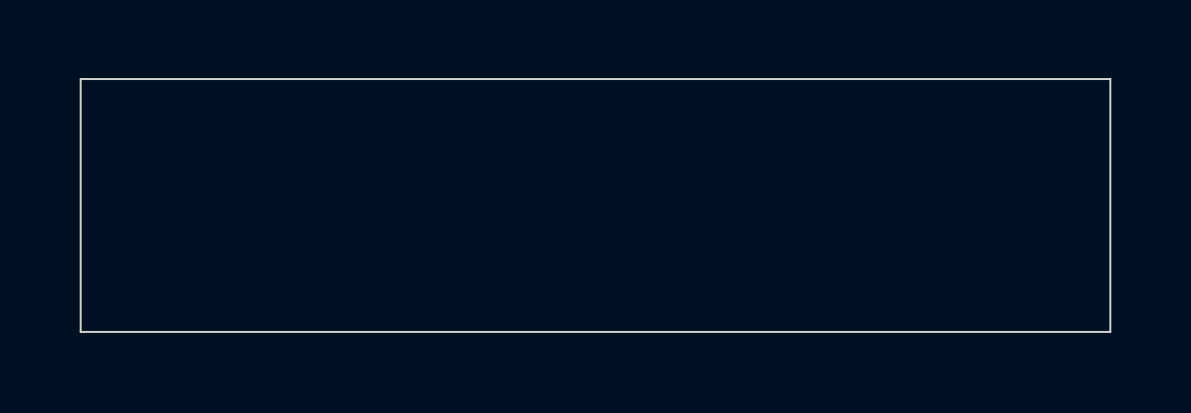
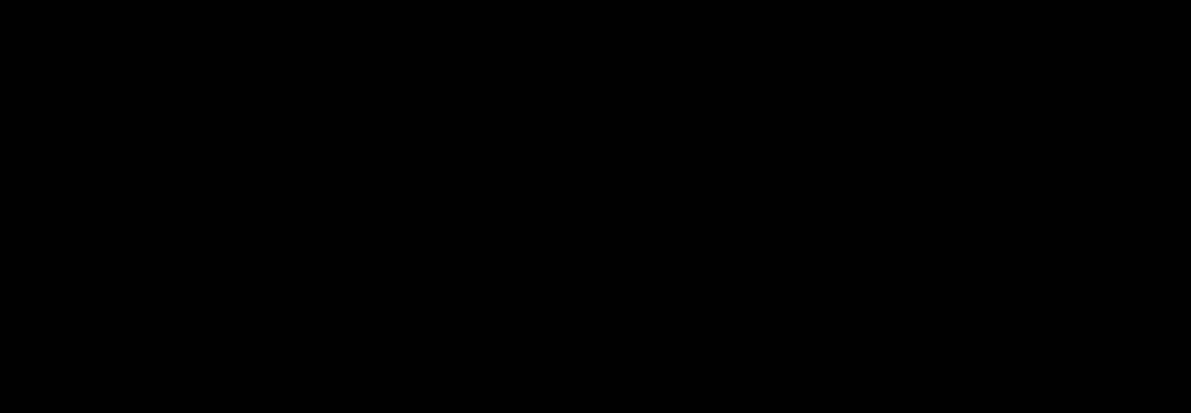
board edge: (1110, 79) (80, 79) (80, 331) (1110, 331) (1110, 79) -> none

